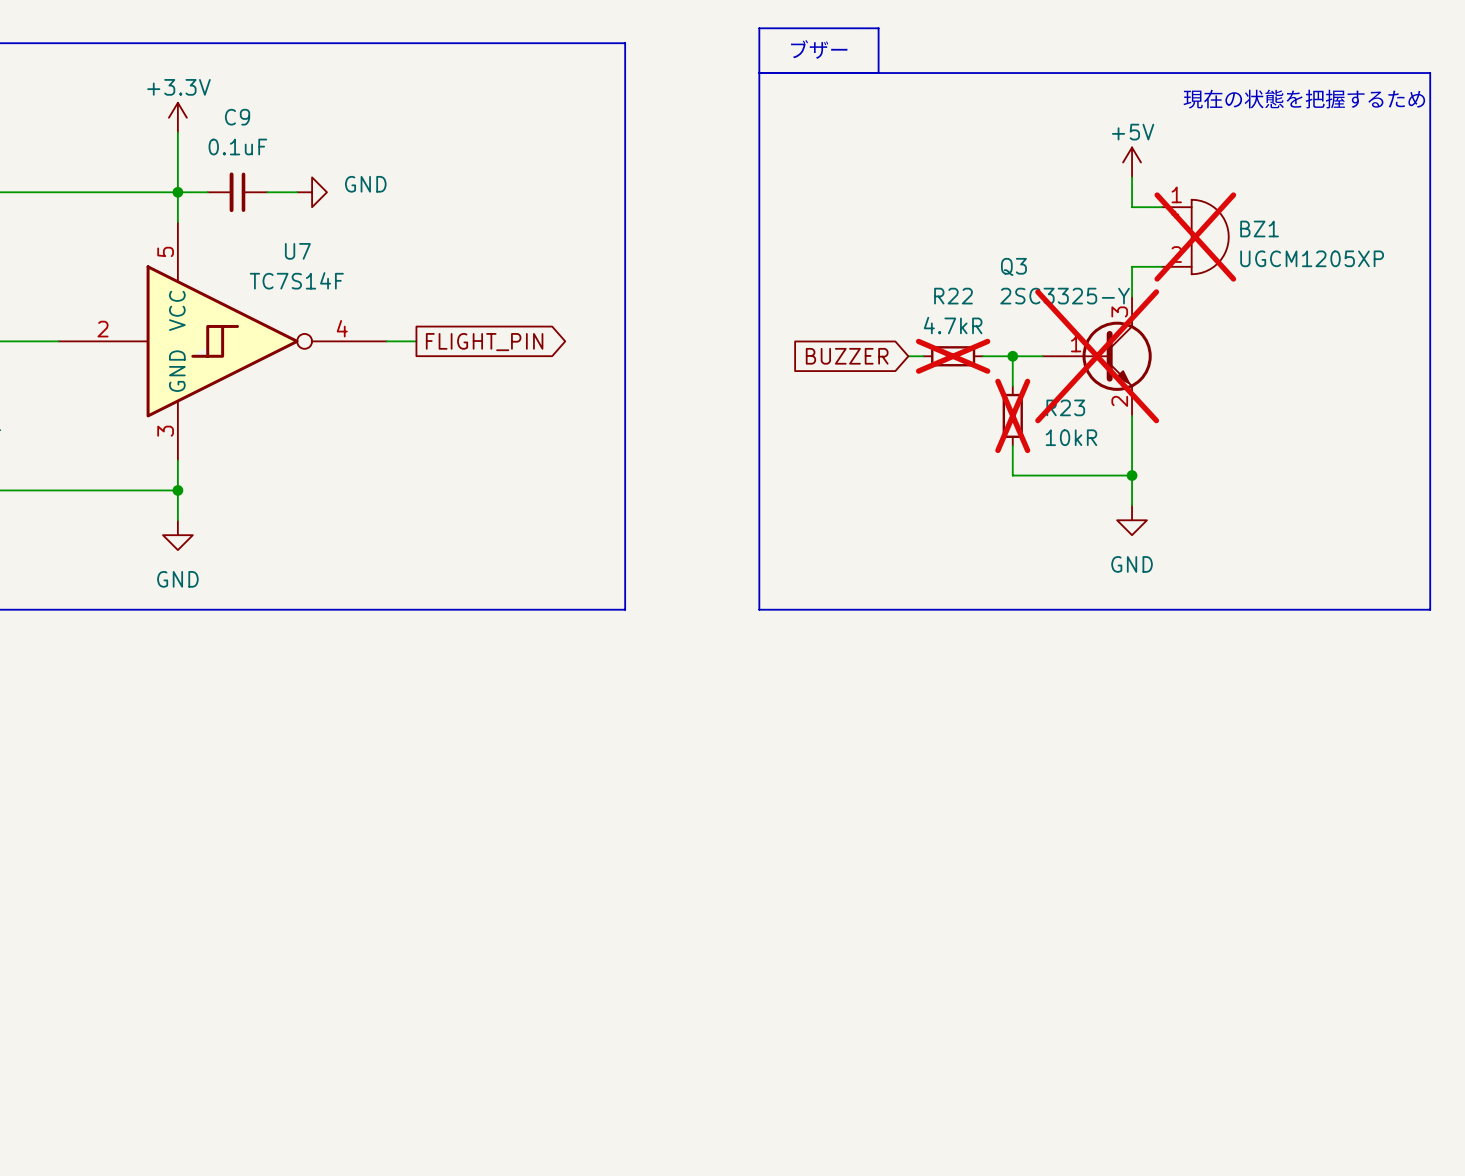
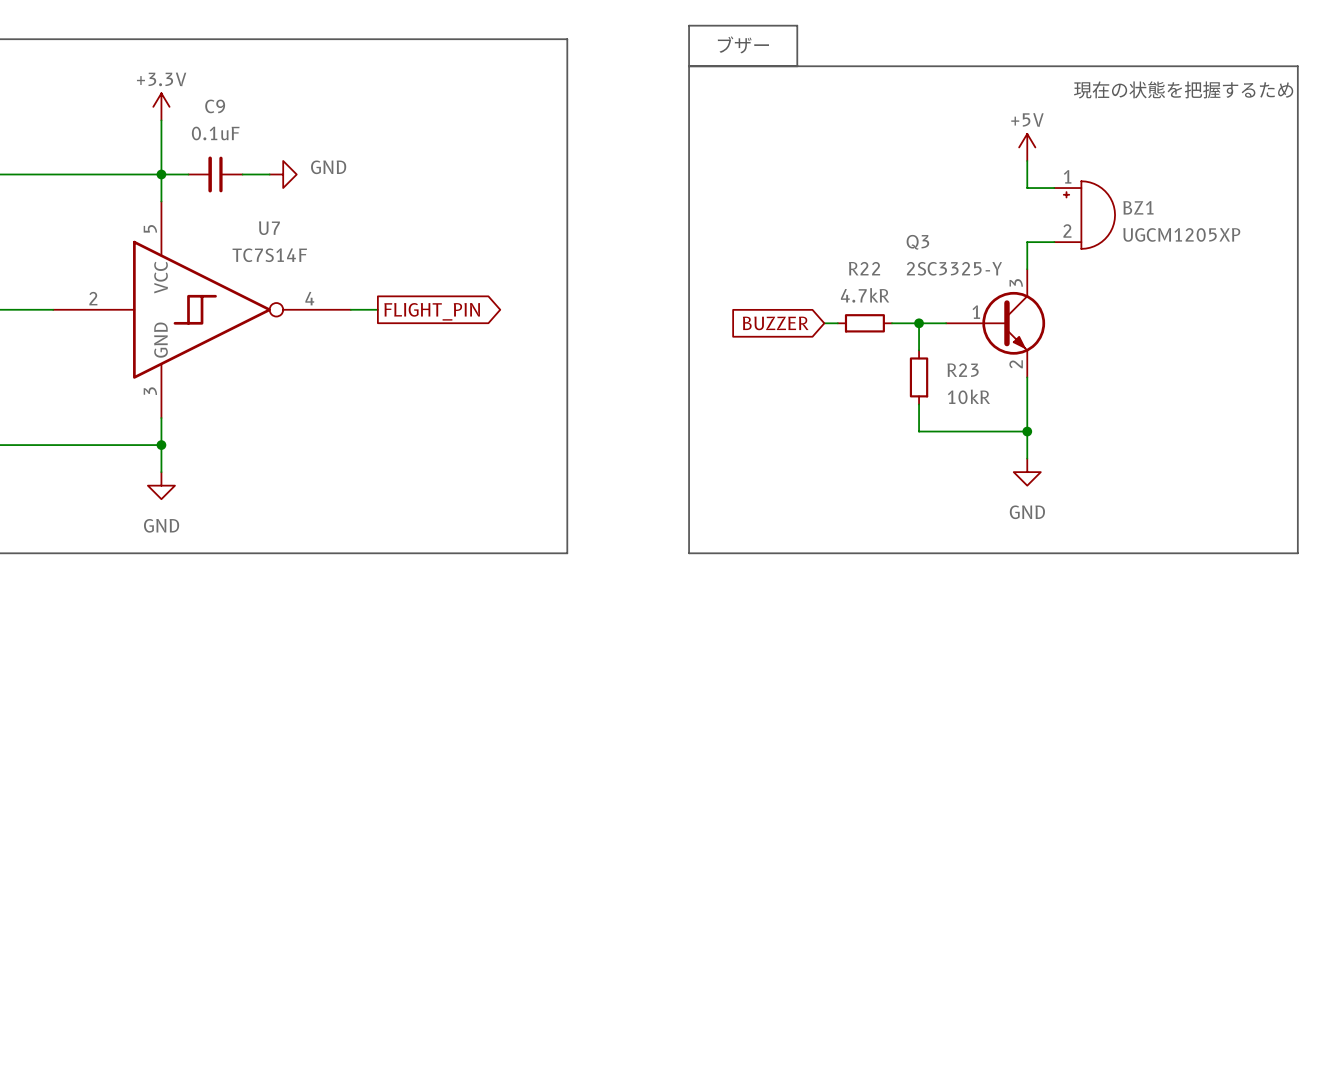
BZ1 do-not-place cross: (1195, 237) -> none
R22 do-not-place cross: (953, 356) -> none
Q3 do-not-place cross: (1097, 356) -> none
R23 do-not-place cross: (1012, 415) -> none

